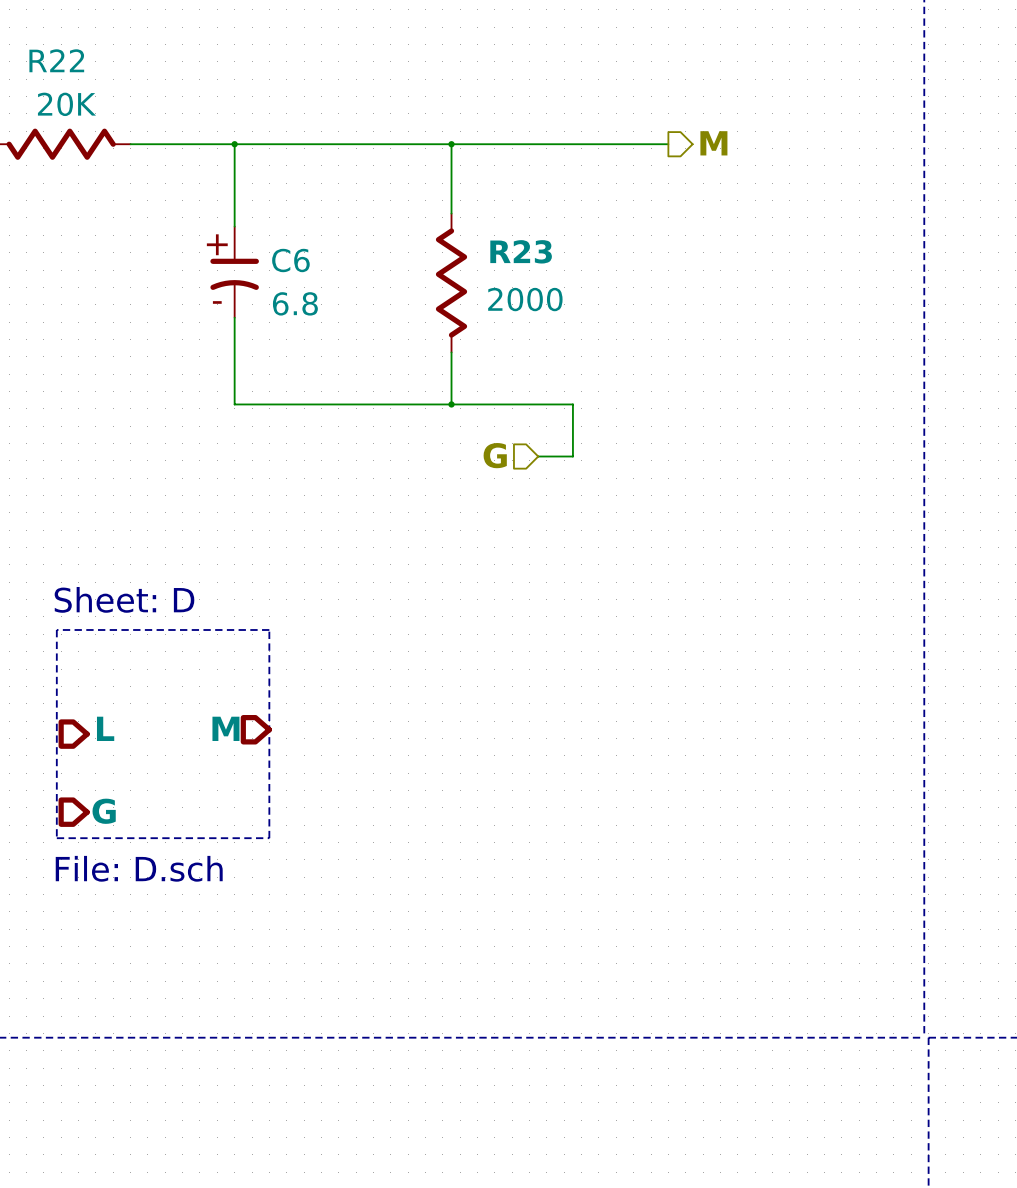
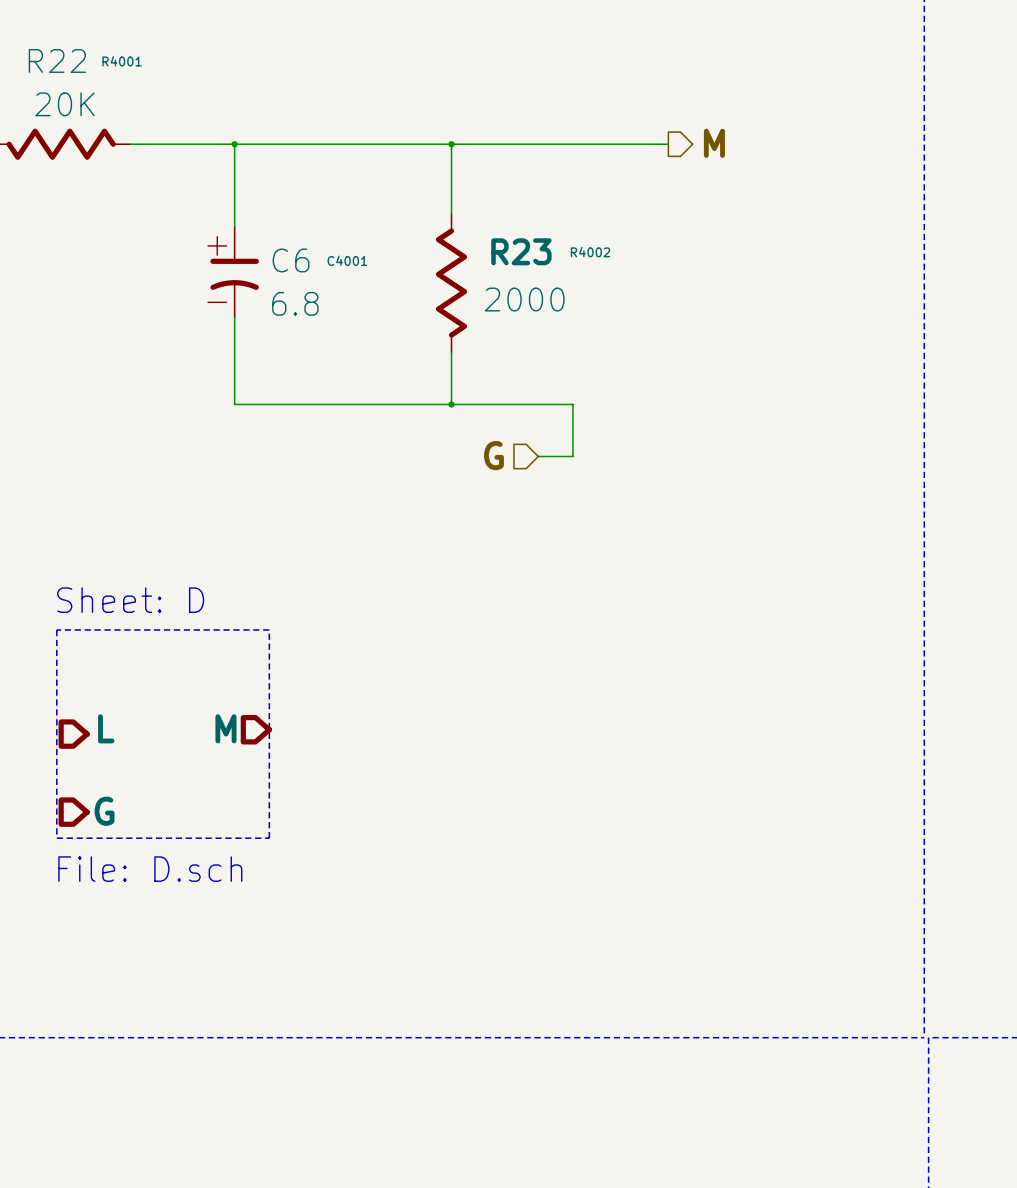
R4001 name: none -> R4001 (122, 61)
R4002 name: none -> R4002 (590, 252)
C4001 name: none -> C4001 (347, 260)

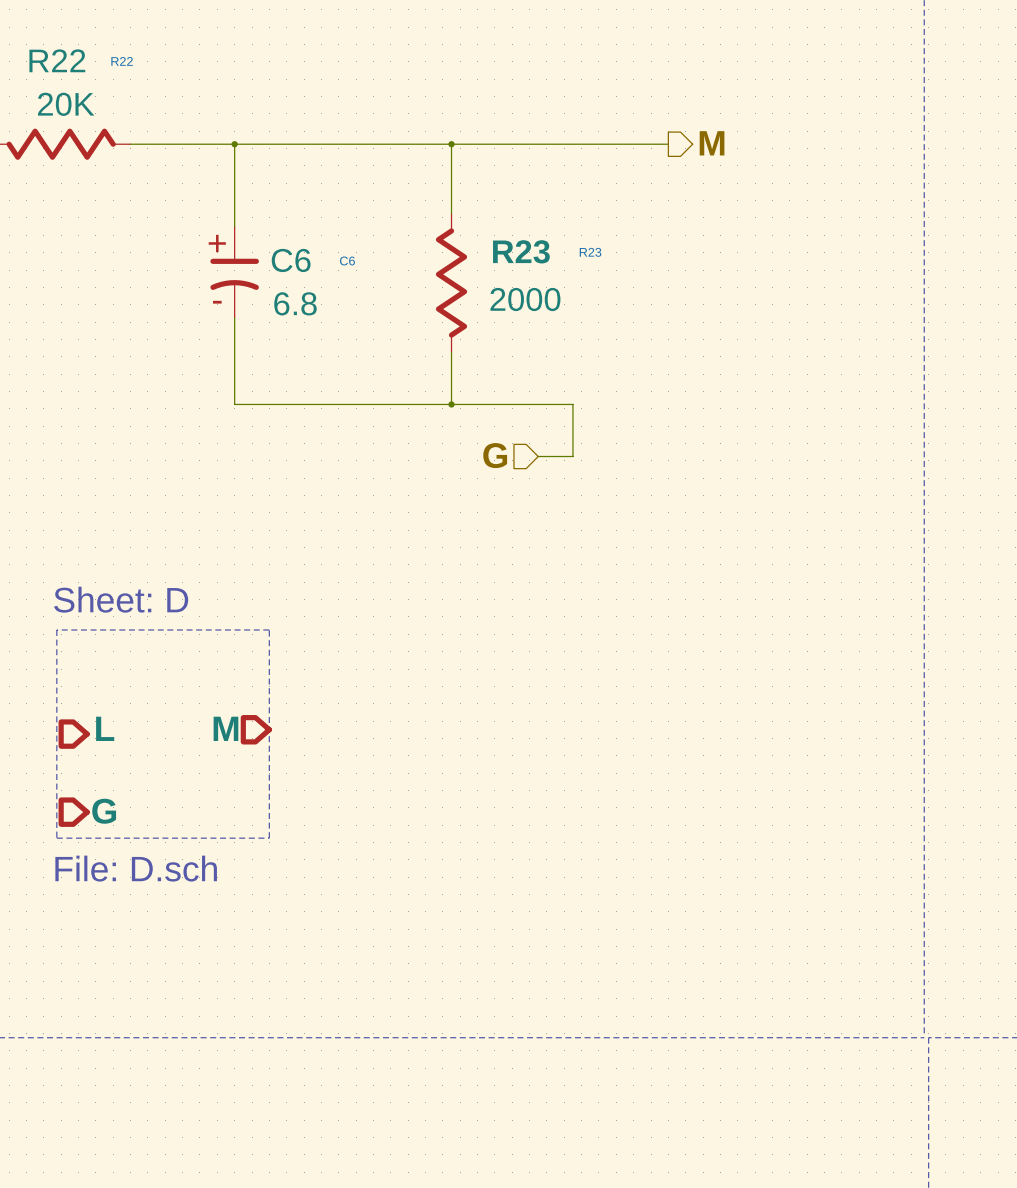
R4001 name: R4001 (122, 61) -> R22 (122, 61)
R4002 name: R4002 (590, 252) -> R23 (590, 252)
C4001 name: C4001 (347, 260) -> C6 (347, 261)

